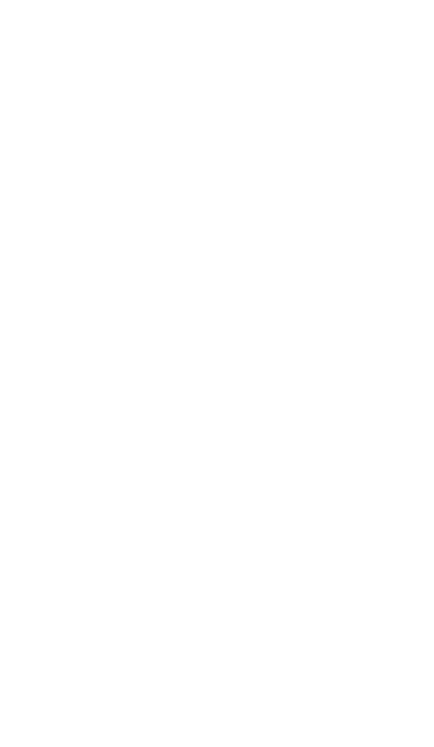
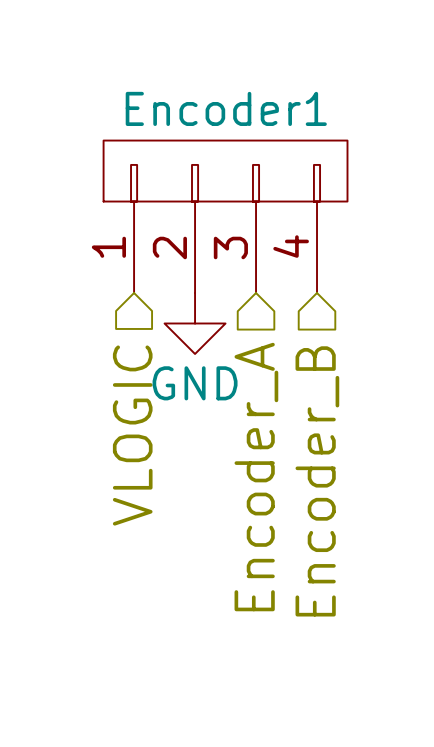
Encoder1: none -> (225, 216)
power symbol: none -> GND (195, 323)
hierarchical label: none -> VLOGIC (132, 435)
hierarchical label: none -> Encoder_A (256, 477)
hierarchical label: none -> Encoder_B (317, 481)

